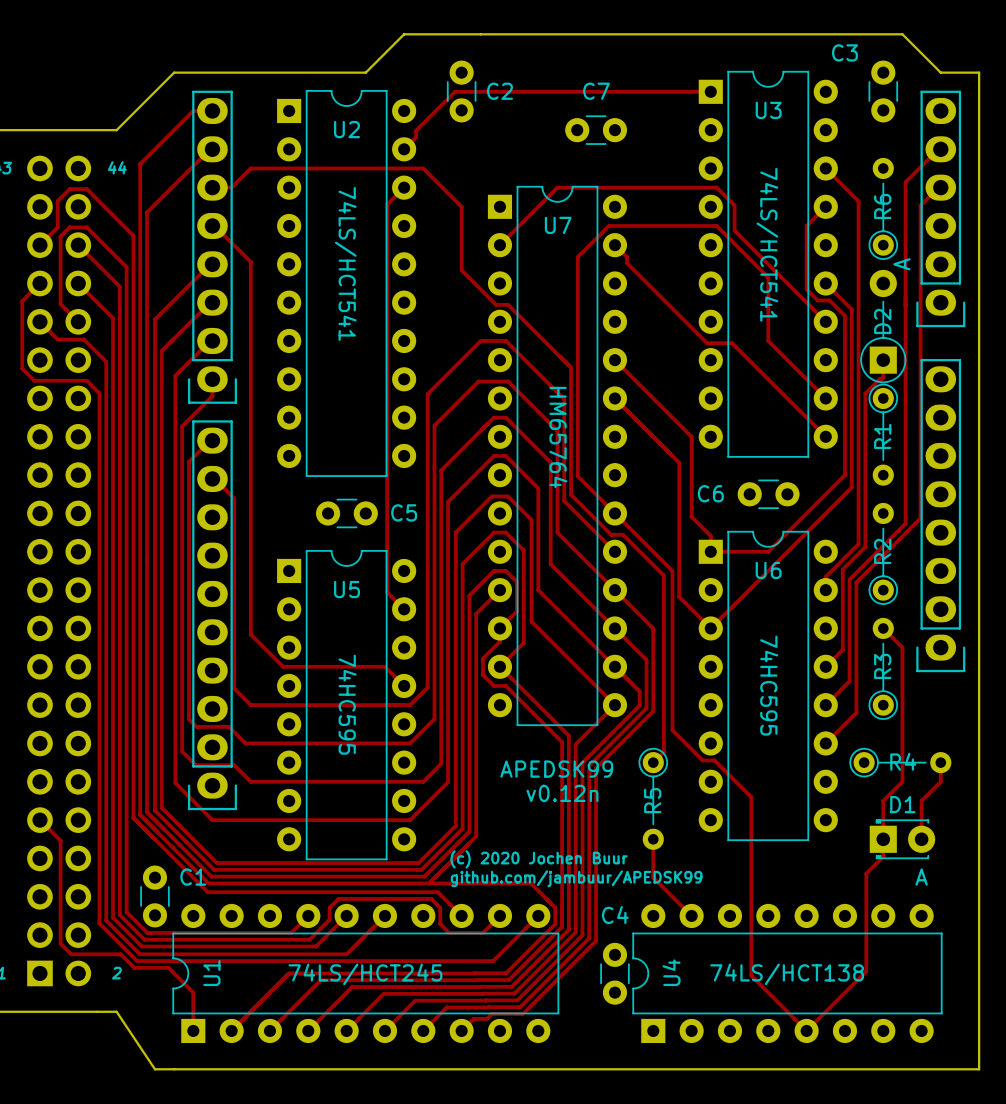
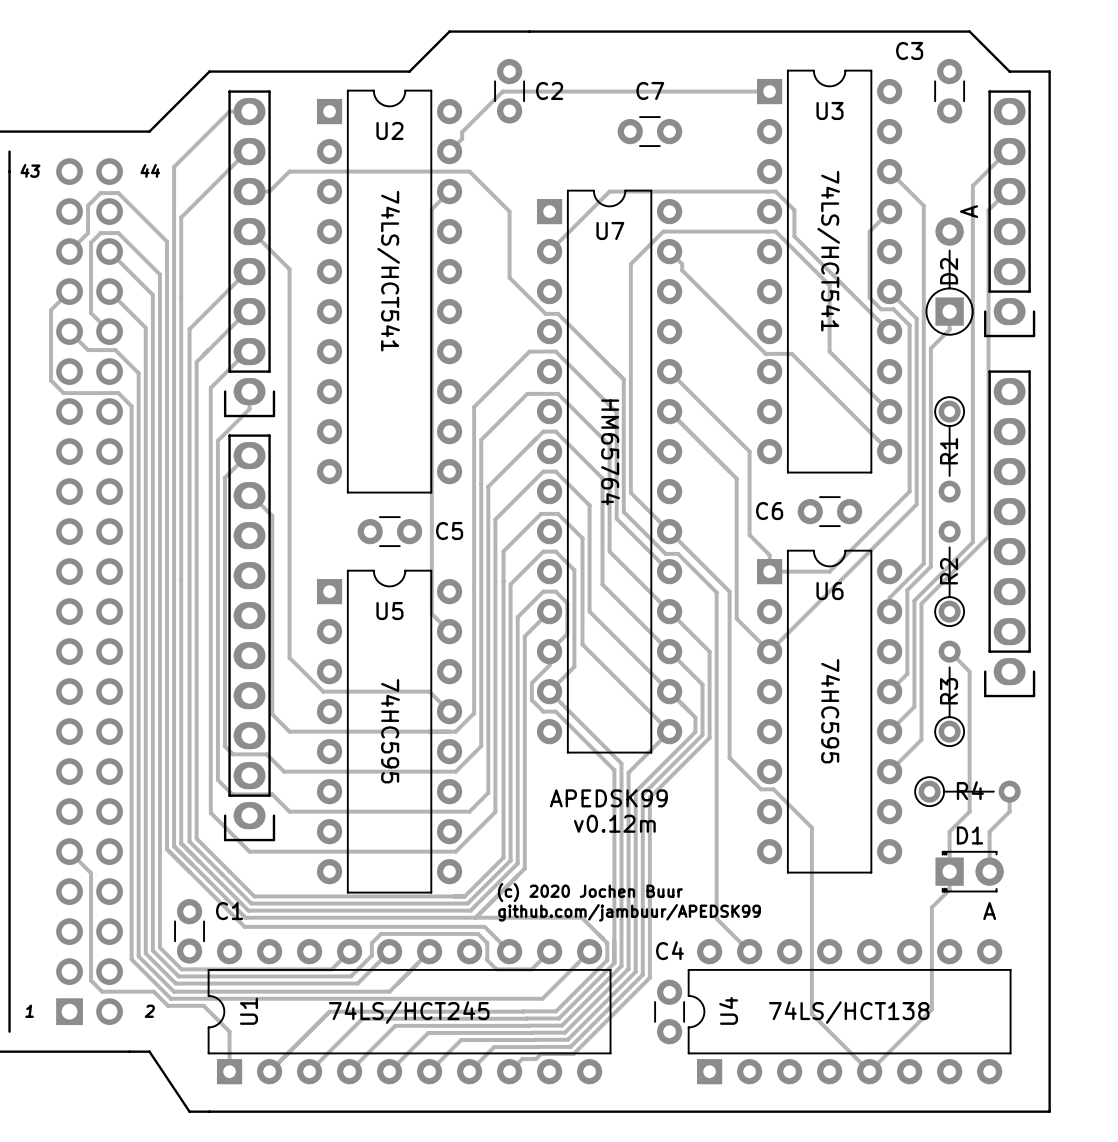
R6: (883, 208) -> none
D2 position: (883, 326) -> (949, 276)
track: (883, 360) (883, 377) (865, 393) -> (949, 311) (949, 329) (930, 348) (930, 406)
track: (660, 571) (663, 575) (663, 752) (653, 762) -> (716, 592) (716, 918)
text: v0.12n (562, 793) -> v0.12m (614, 823)
R5: (653, 798) -> none
track: (653, 839) (653, 877) (660, 884) -> none

